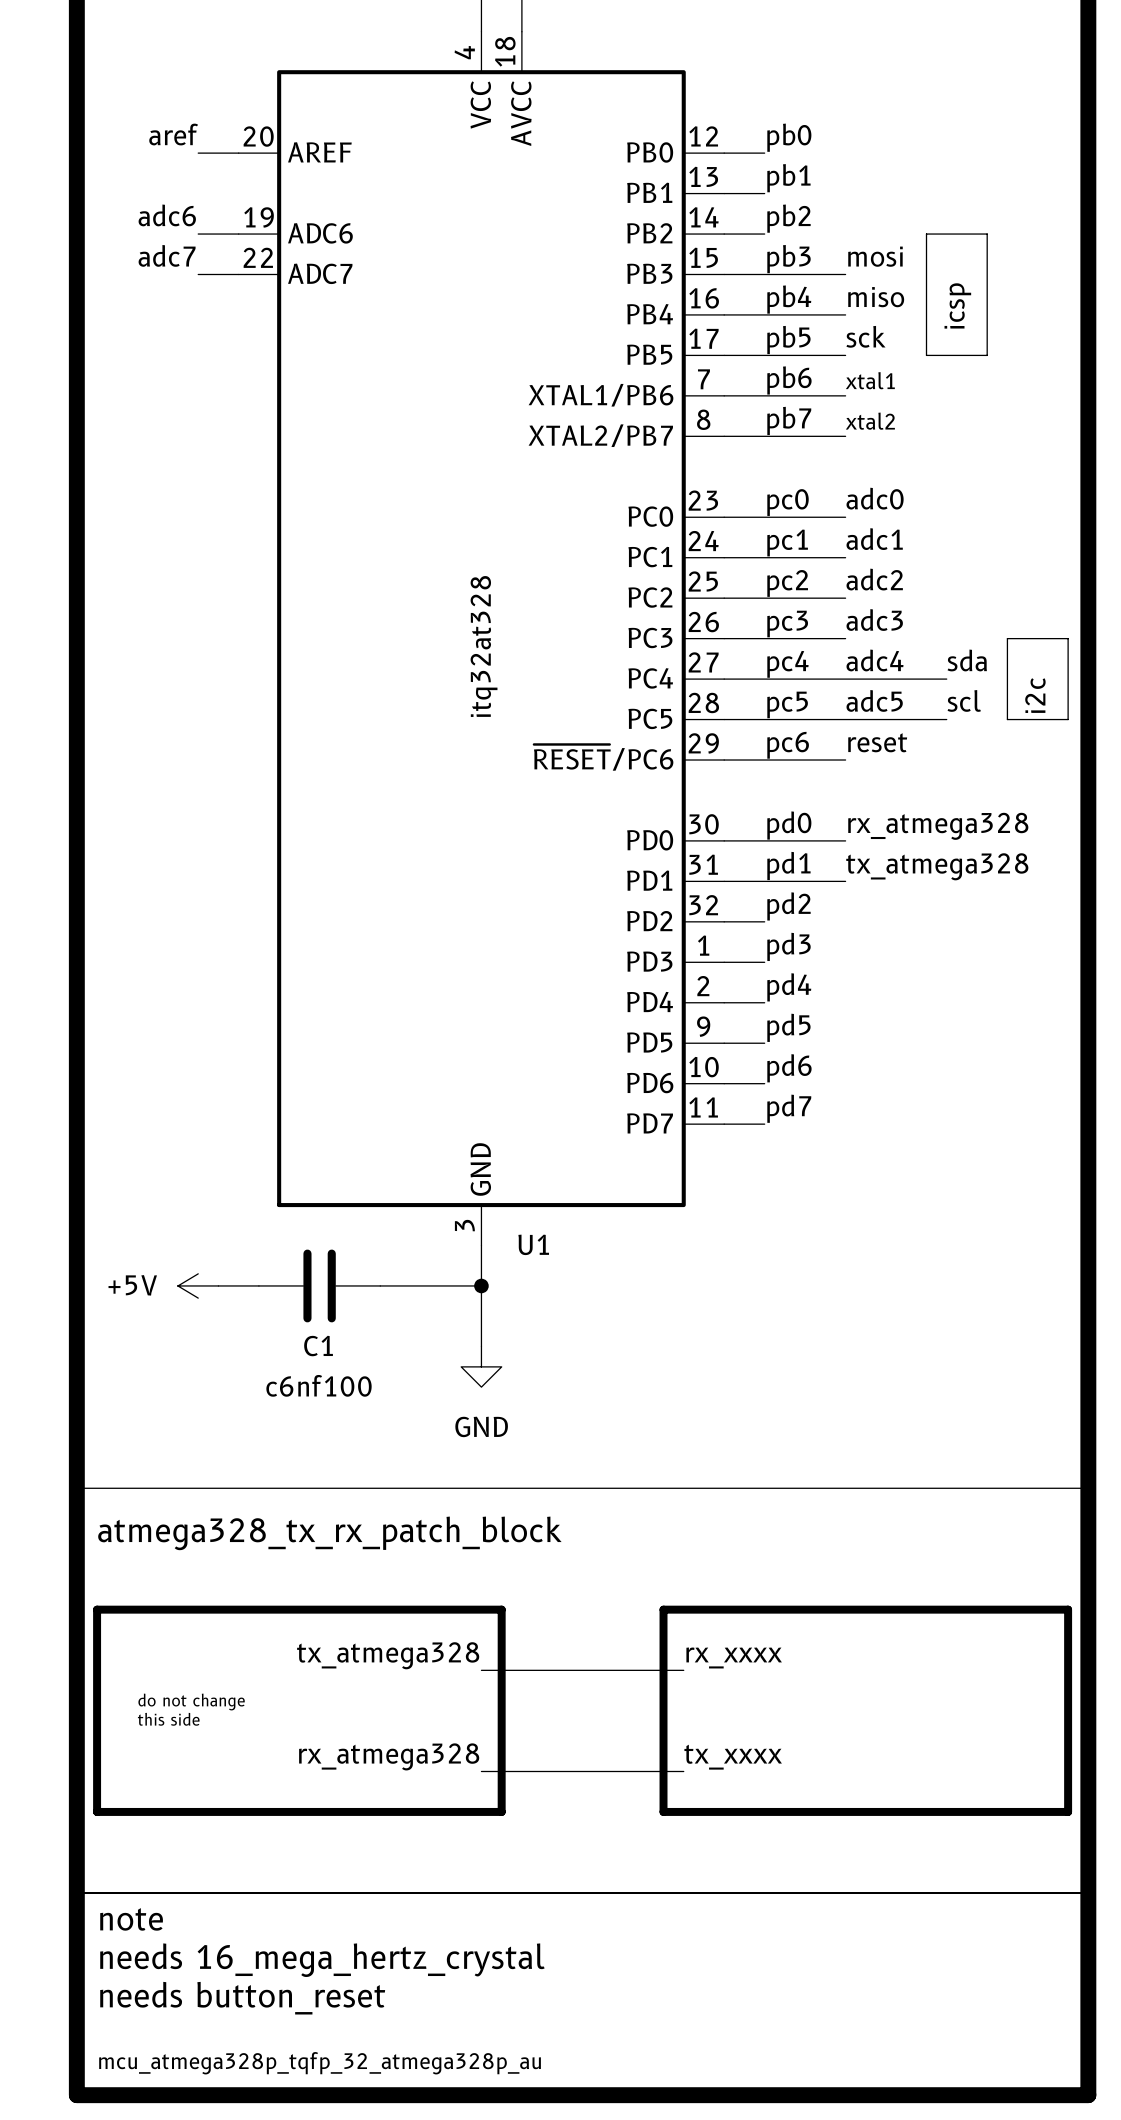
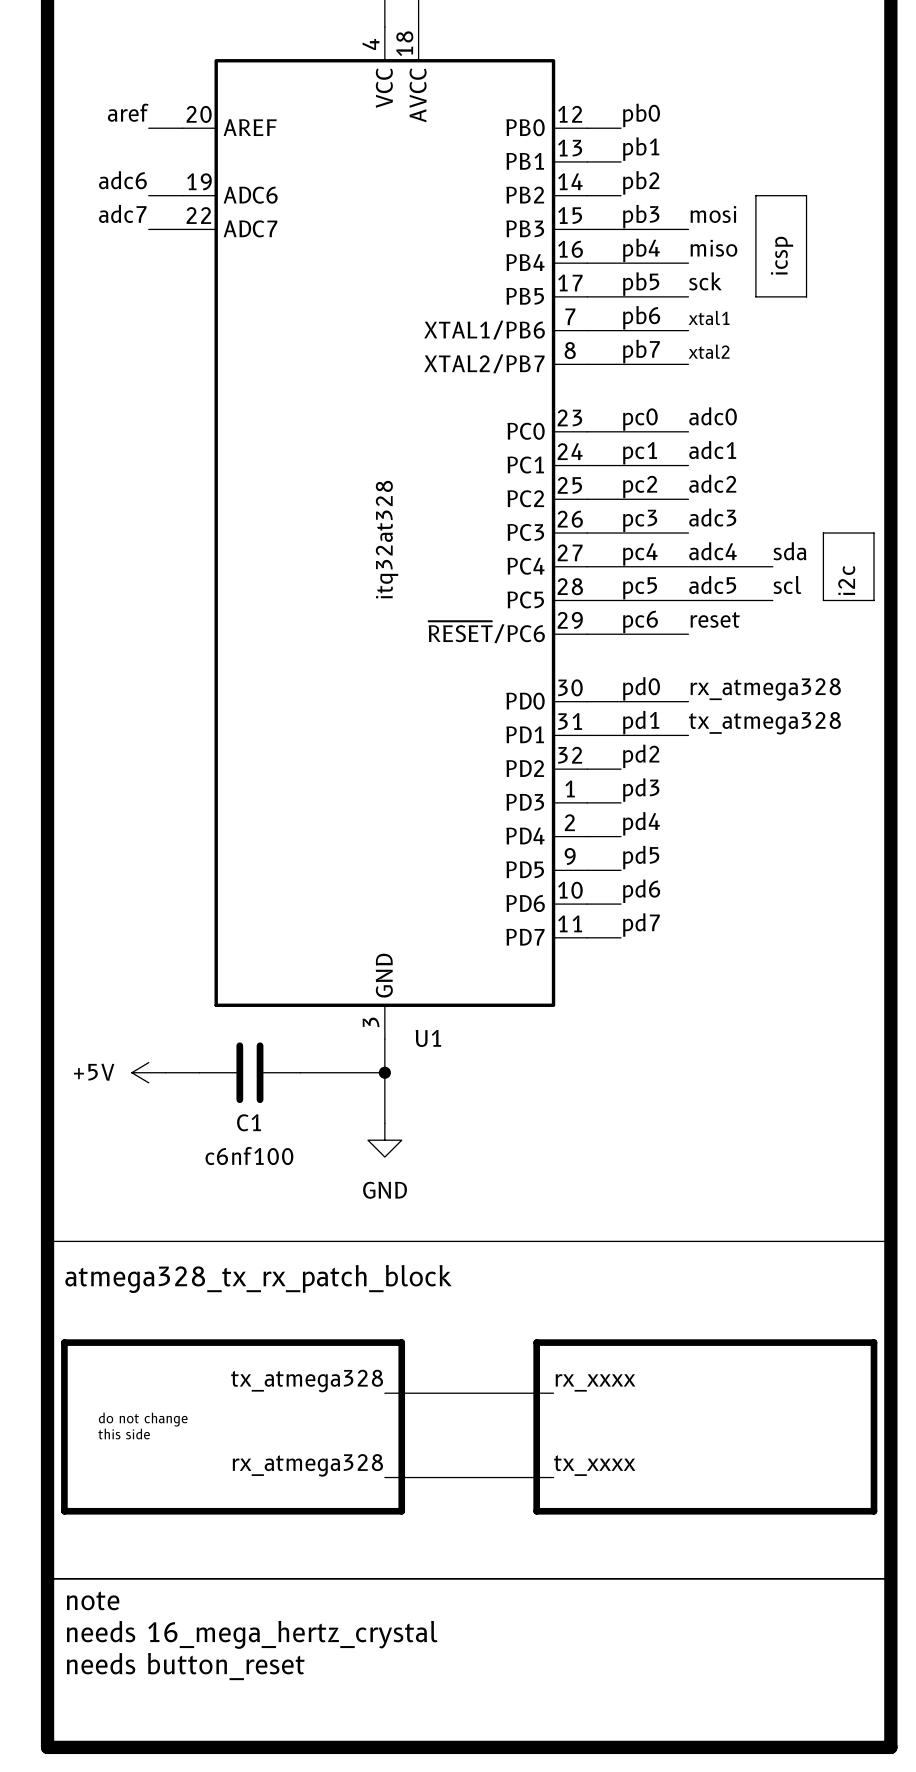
text: mcu_atmega328p_tqfp_32_atmega328p_au (320, 2063) -> none

